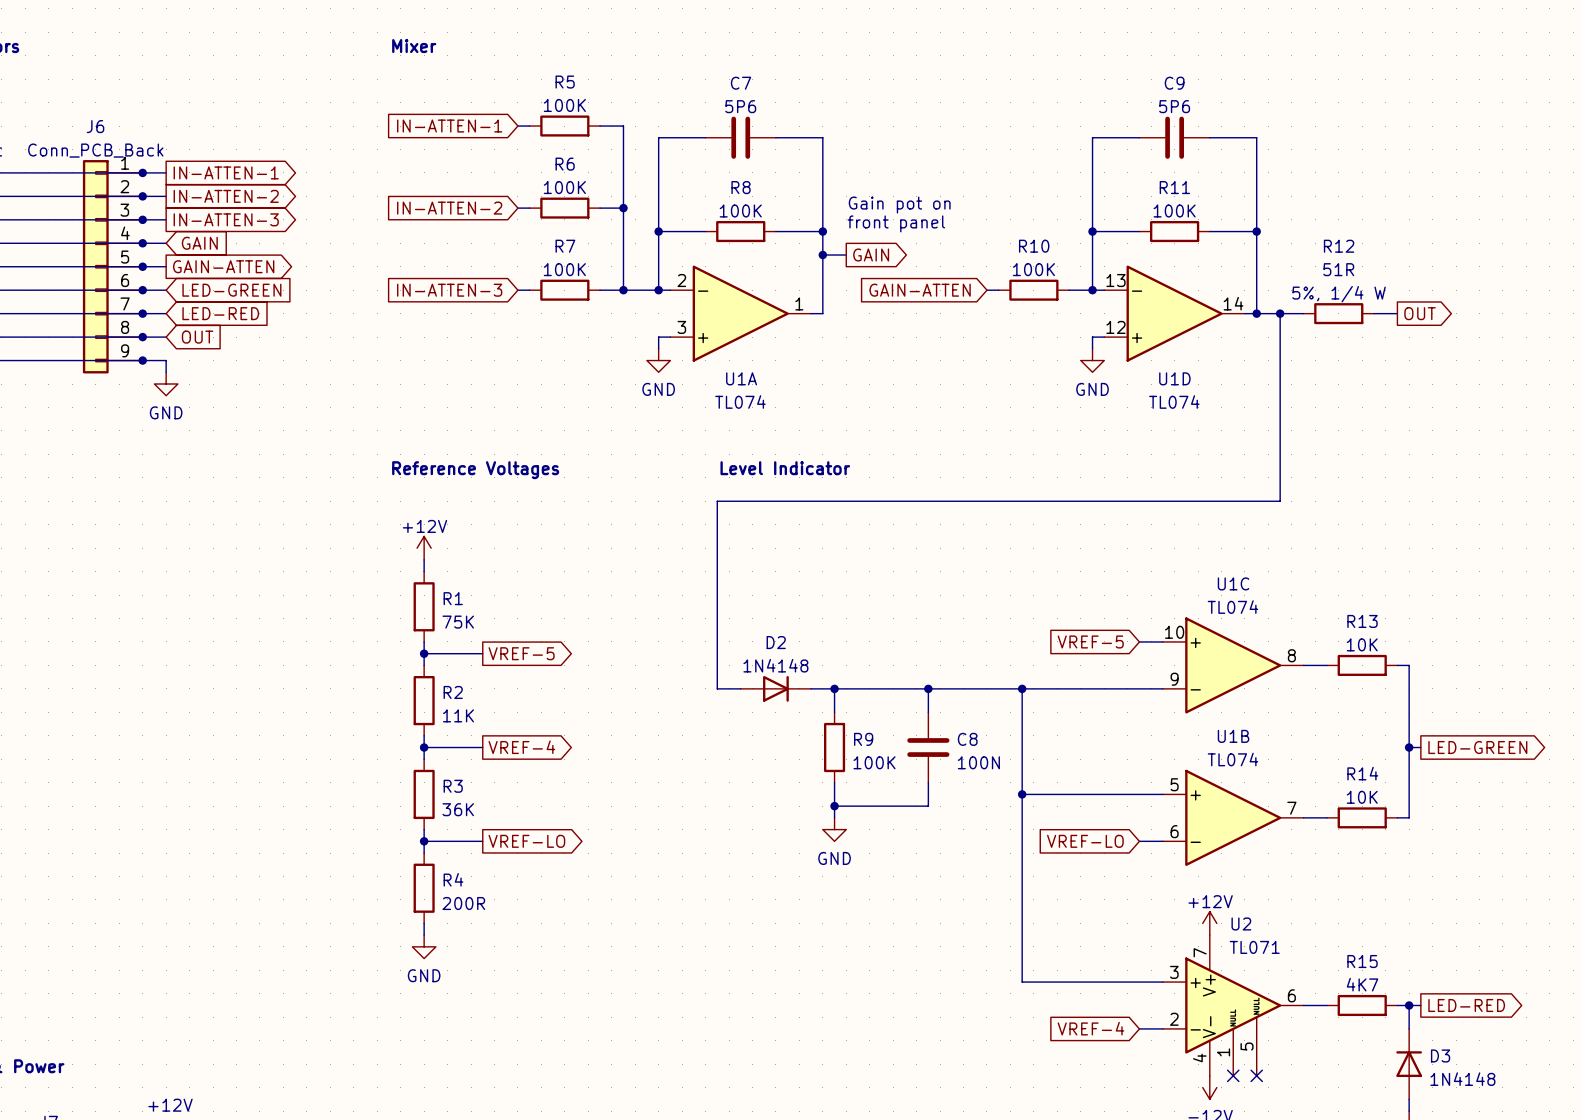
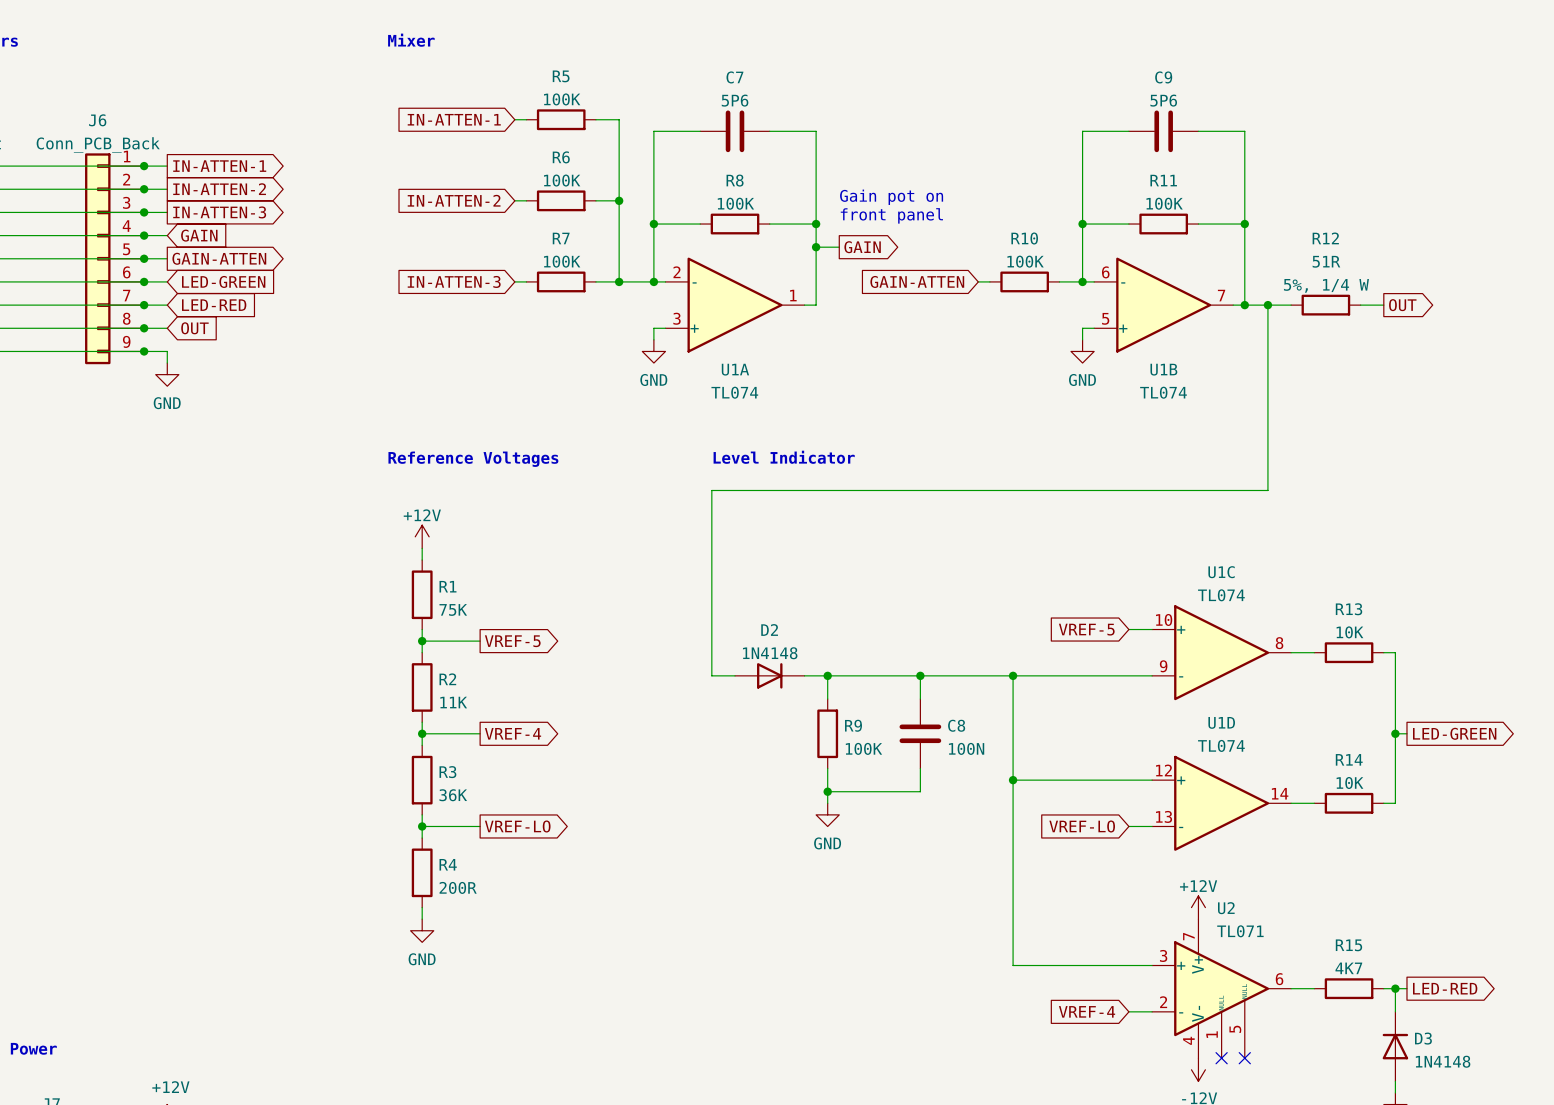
U1D flip: as is (1174, 313) -> up-down (1221, 803)
U1D position: (1174, 313) -> (1221, 803)
U1B flip: as is (1233, 817) -> up-down (1163, 305)
U1B position: (1233, 817) -> (1163, 305)

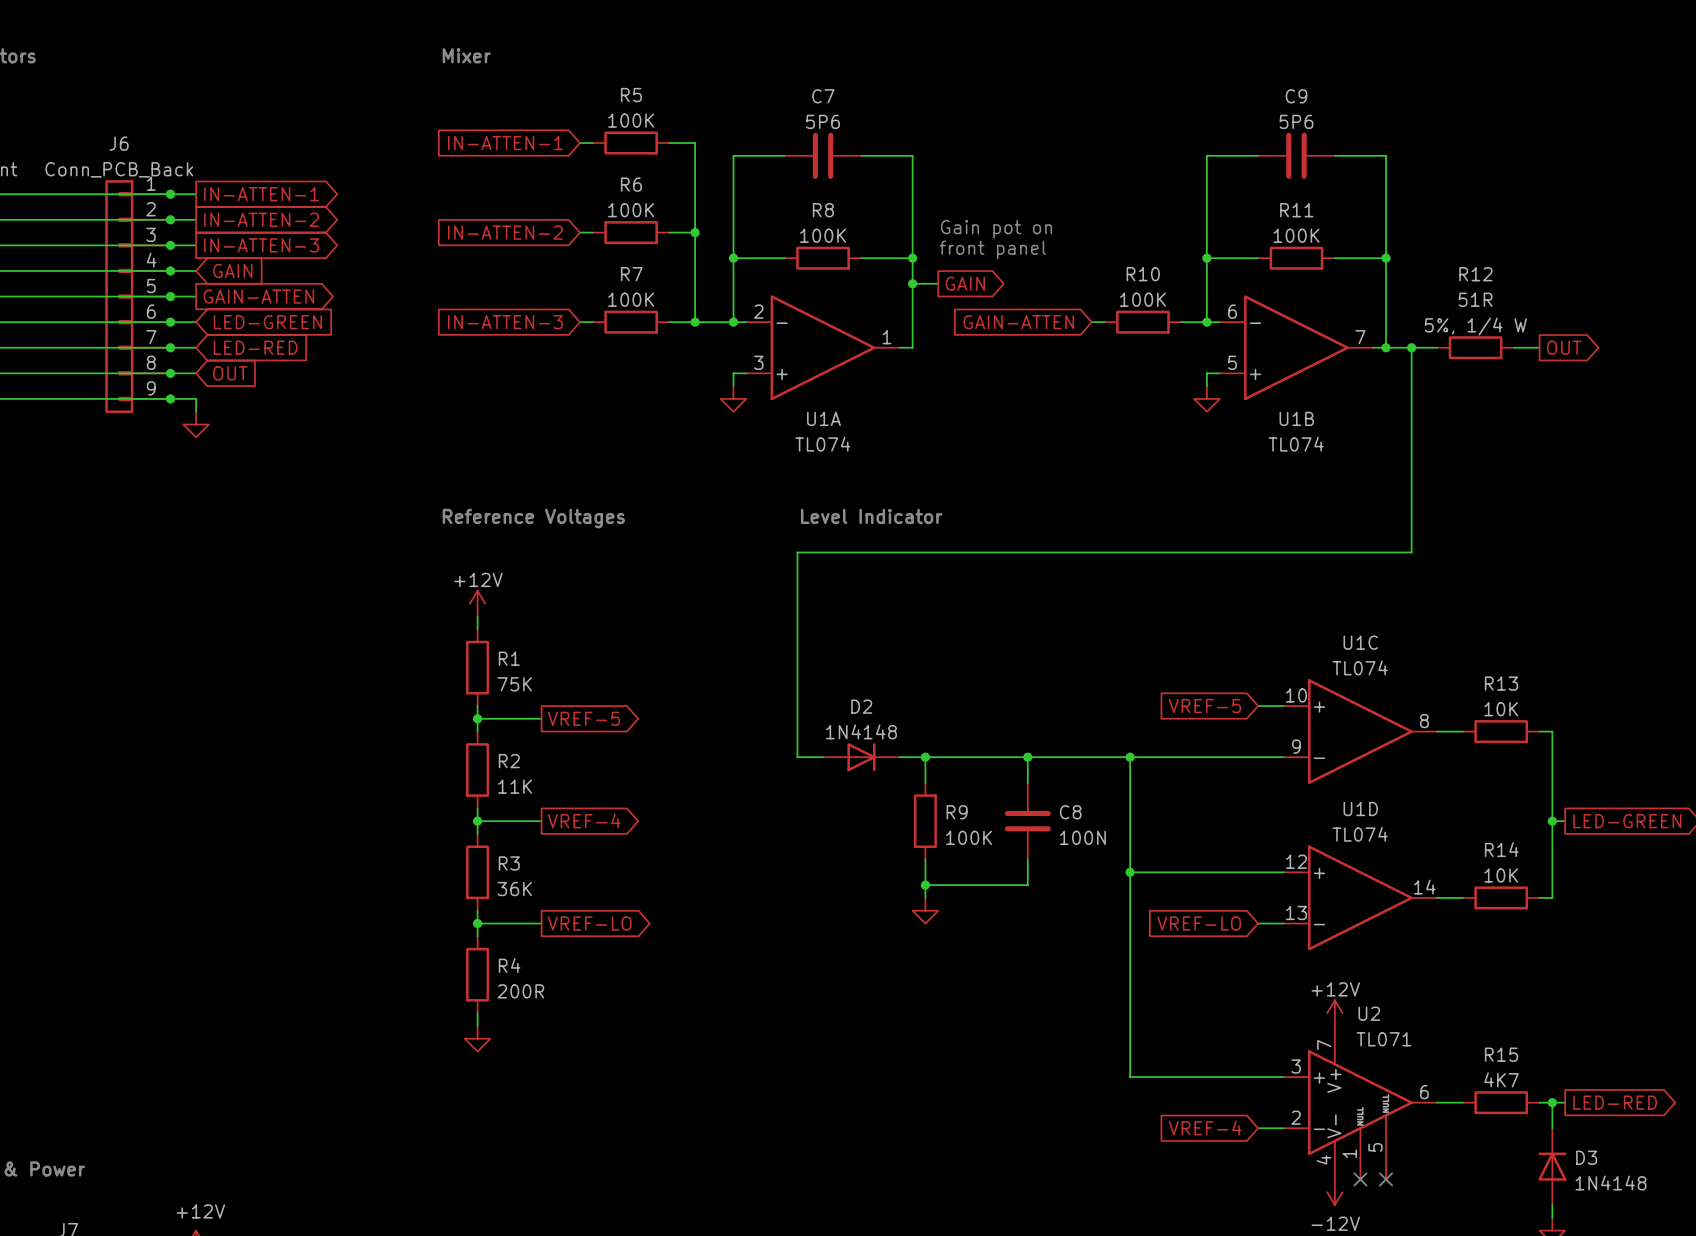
power symbol text: GND (653, 379) -> none
power symbol text: GND (1082, 379) -> none
power symbol text: GND (167, 403) -> none
power symbol text: GND (827, 843) -> none
power symbol text: GND (422, 959) -> none

